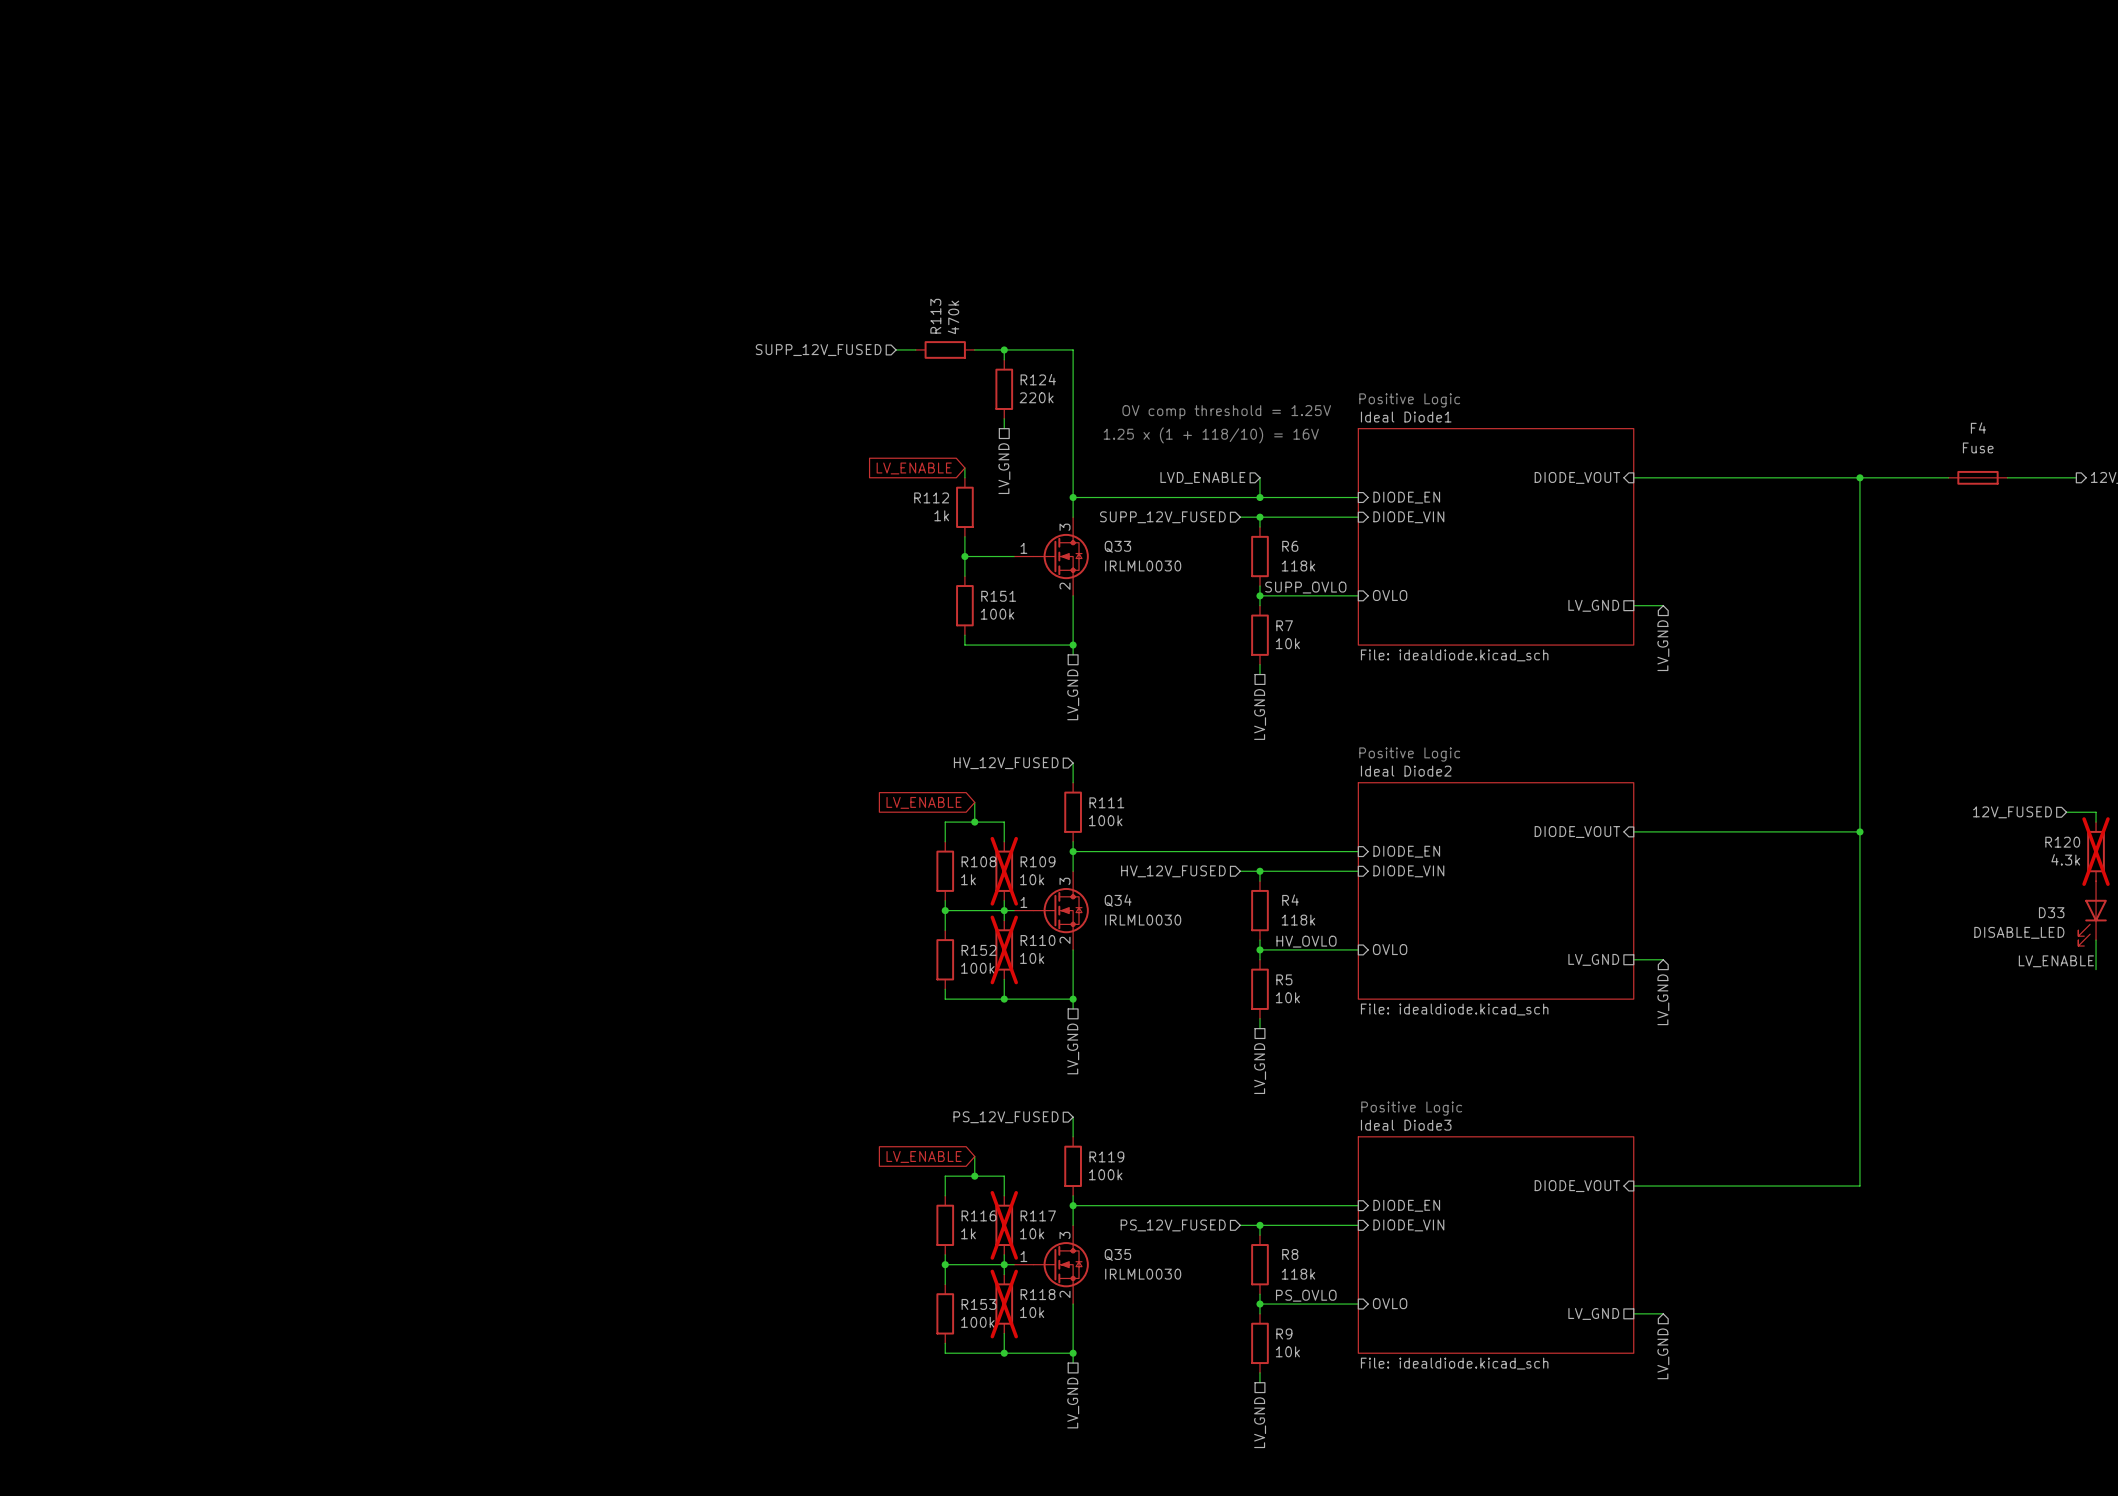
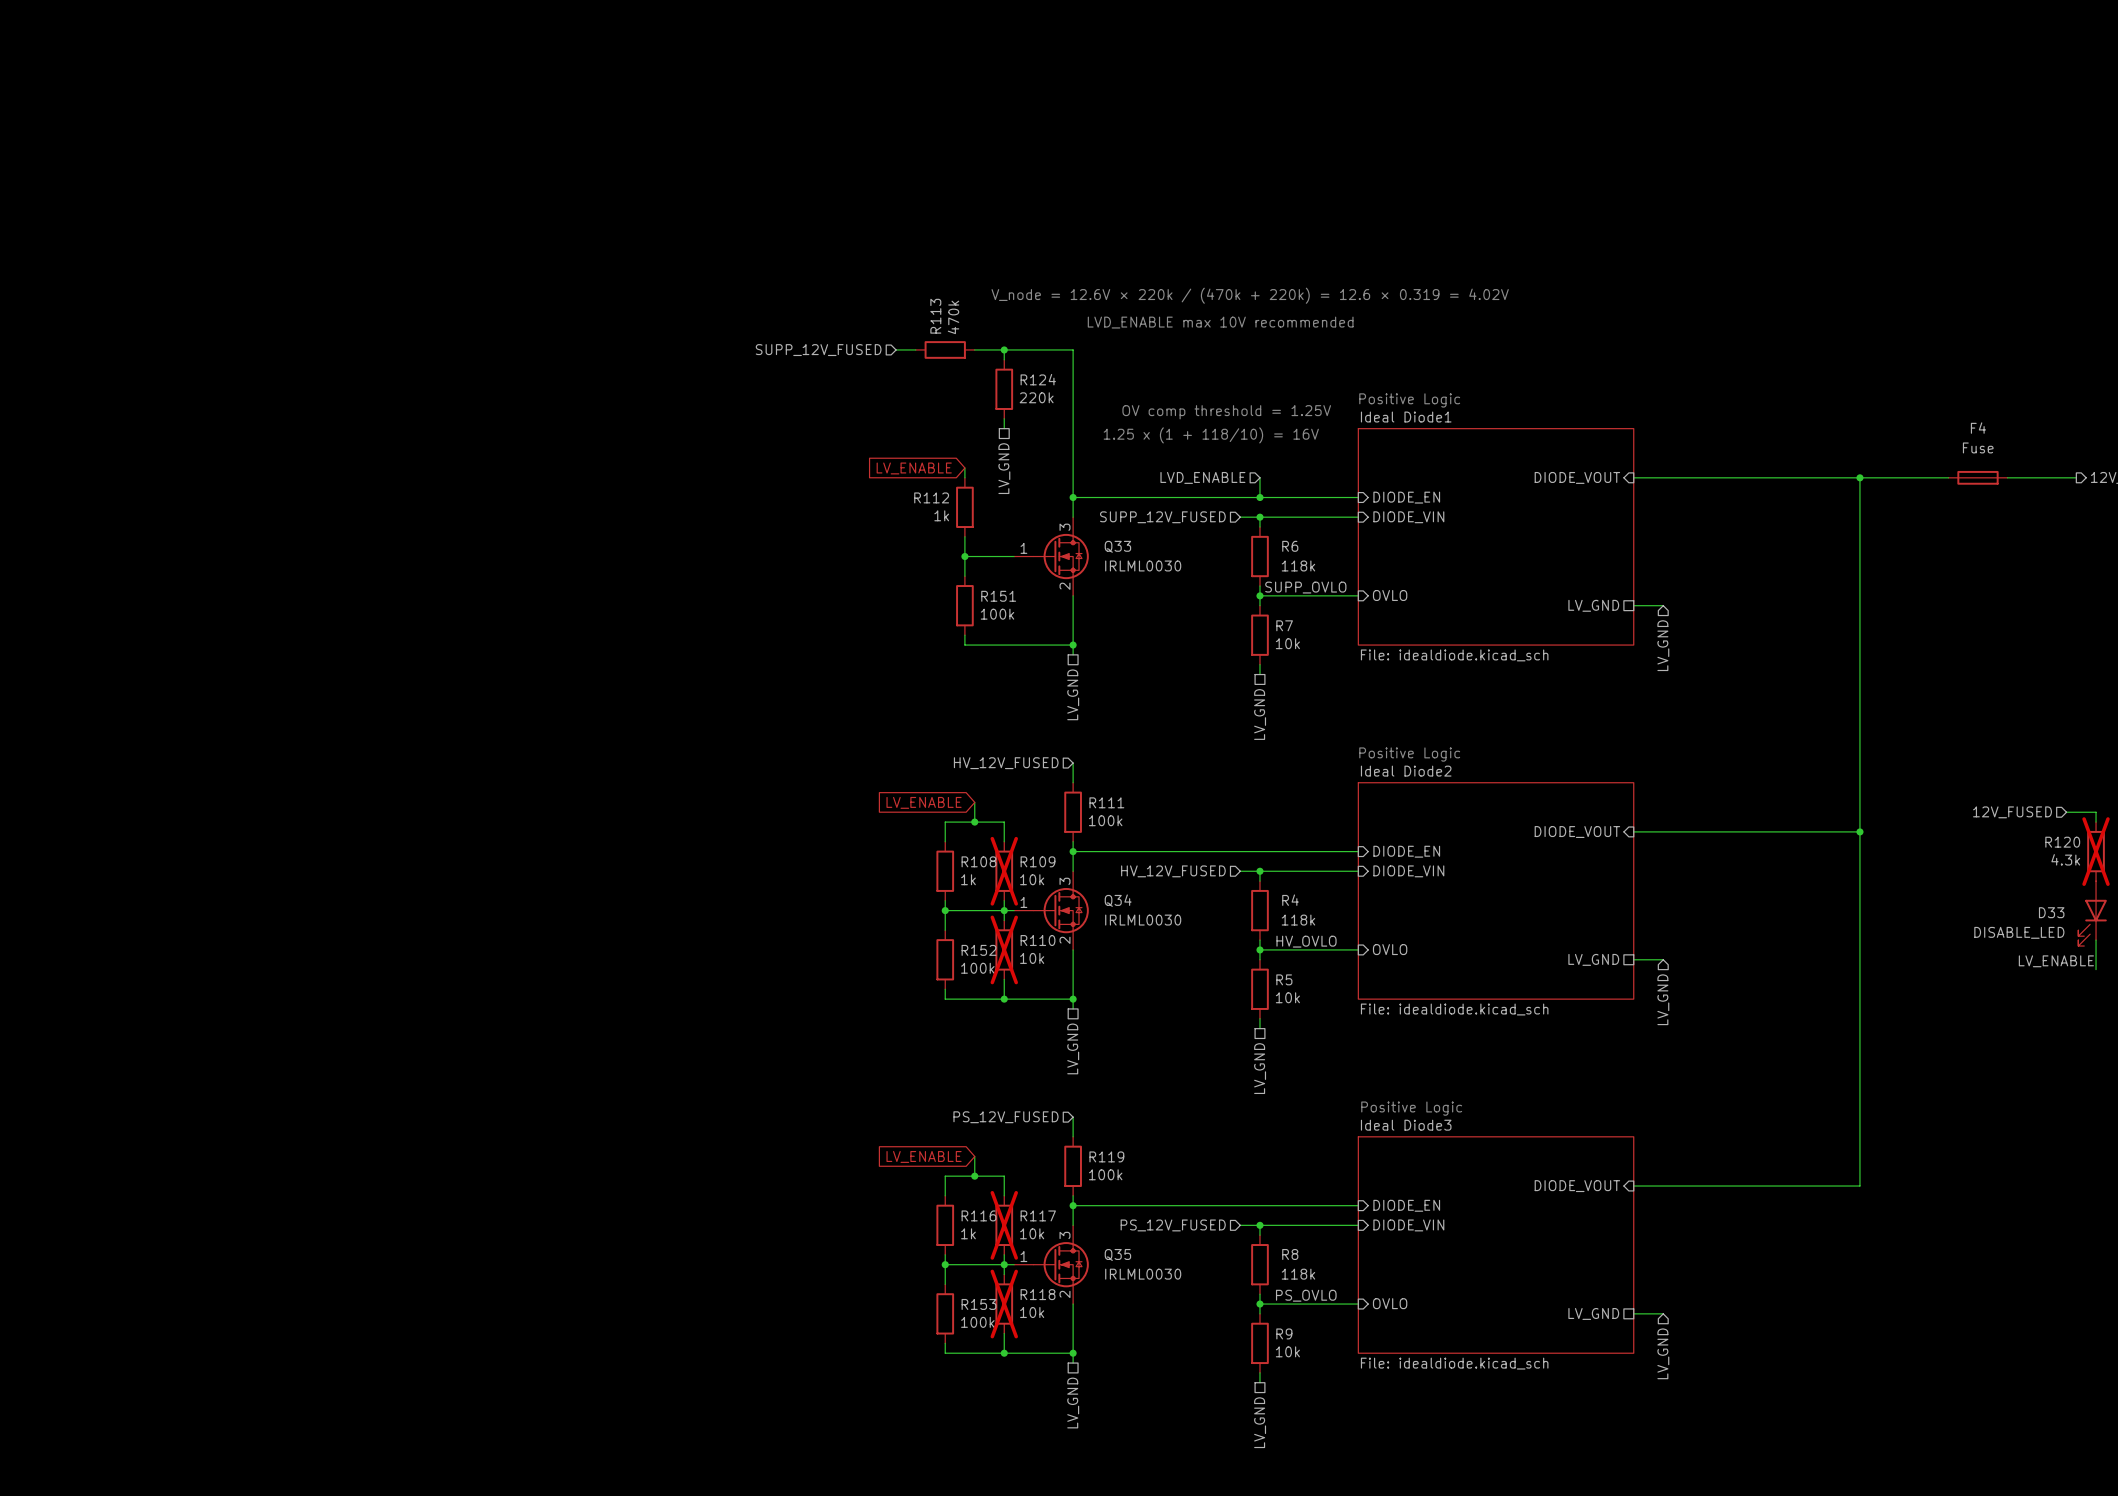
text: none -> V_node = 12.6V × 220k / (470k + 220k) = 12.6 × 0.319 = 4.02V (1250, 295)
text: none -> LVD_ENABLE max 10V recommended (1220, 322)

